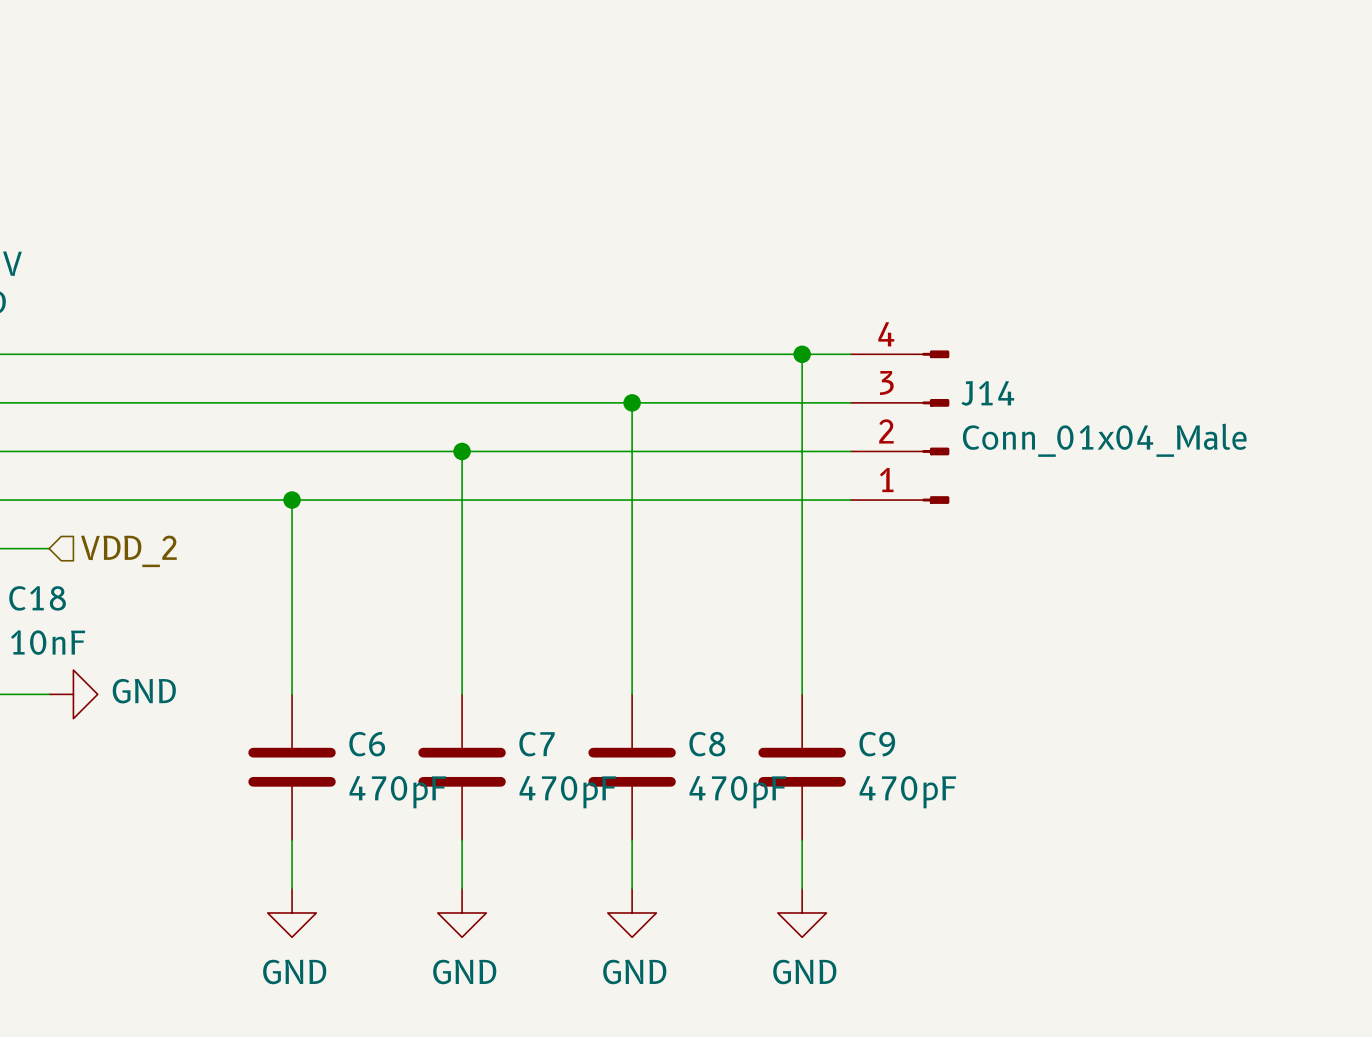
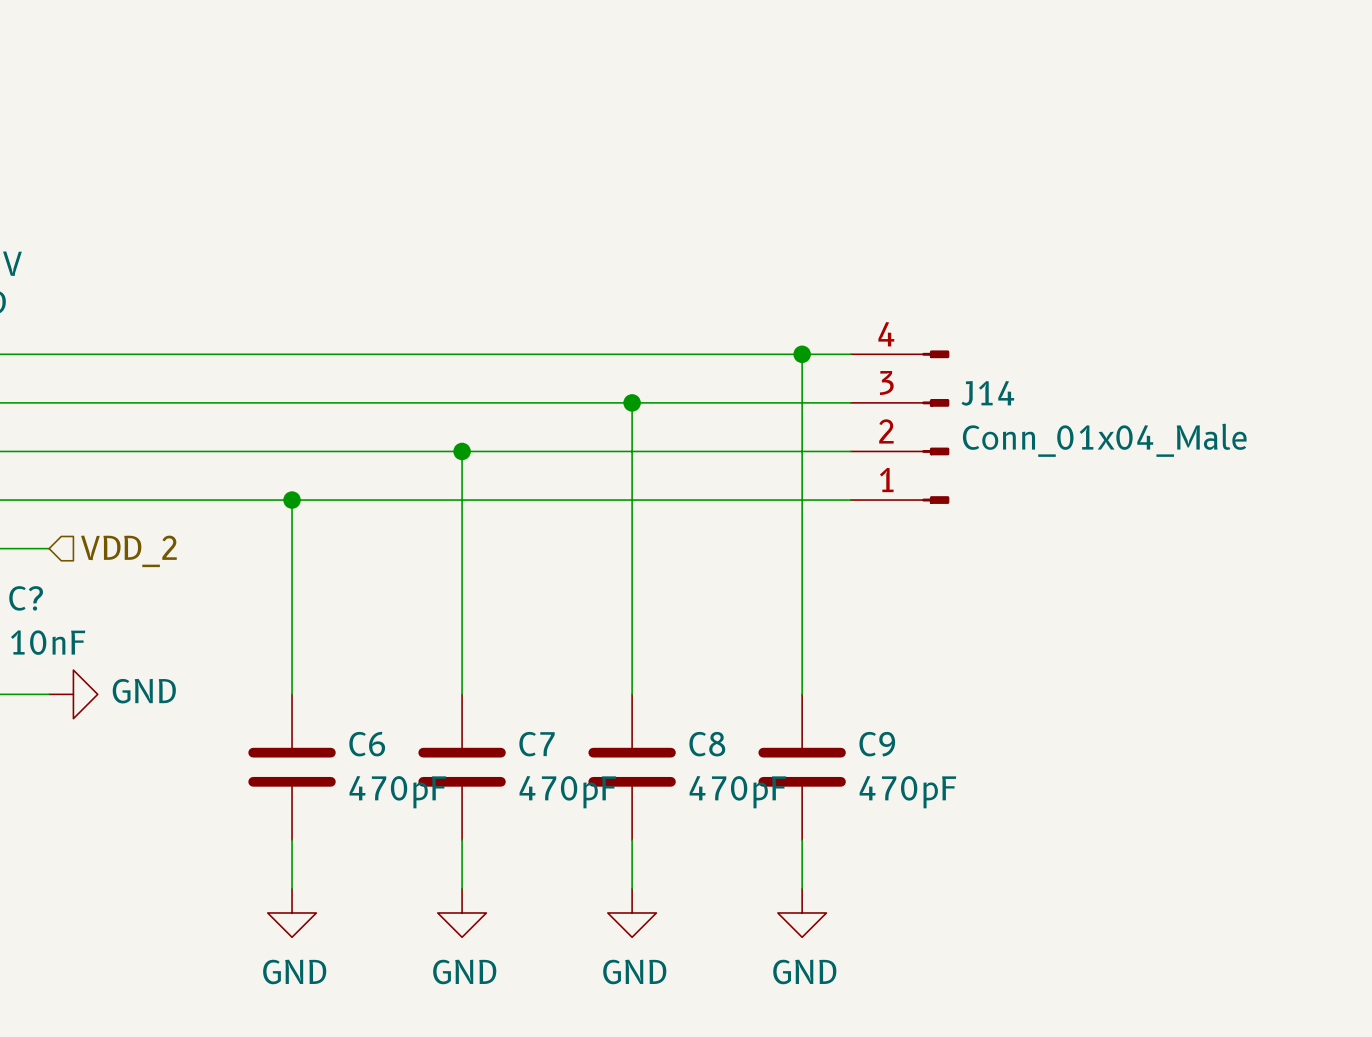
C18 name: C18 (37, 598) -> C? (26, 598)

